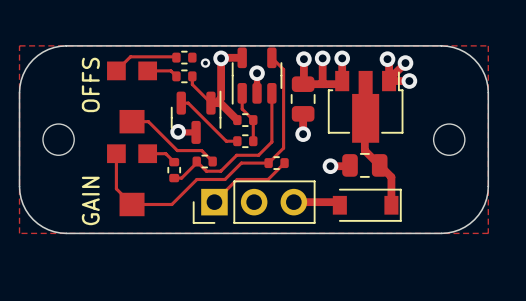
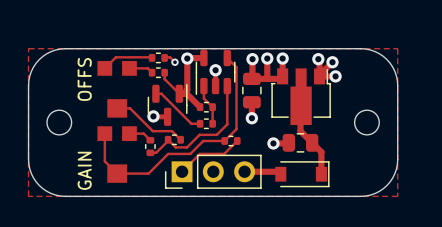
track: none -> (164, 57) (170, 57) (174, 62)

